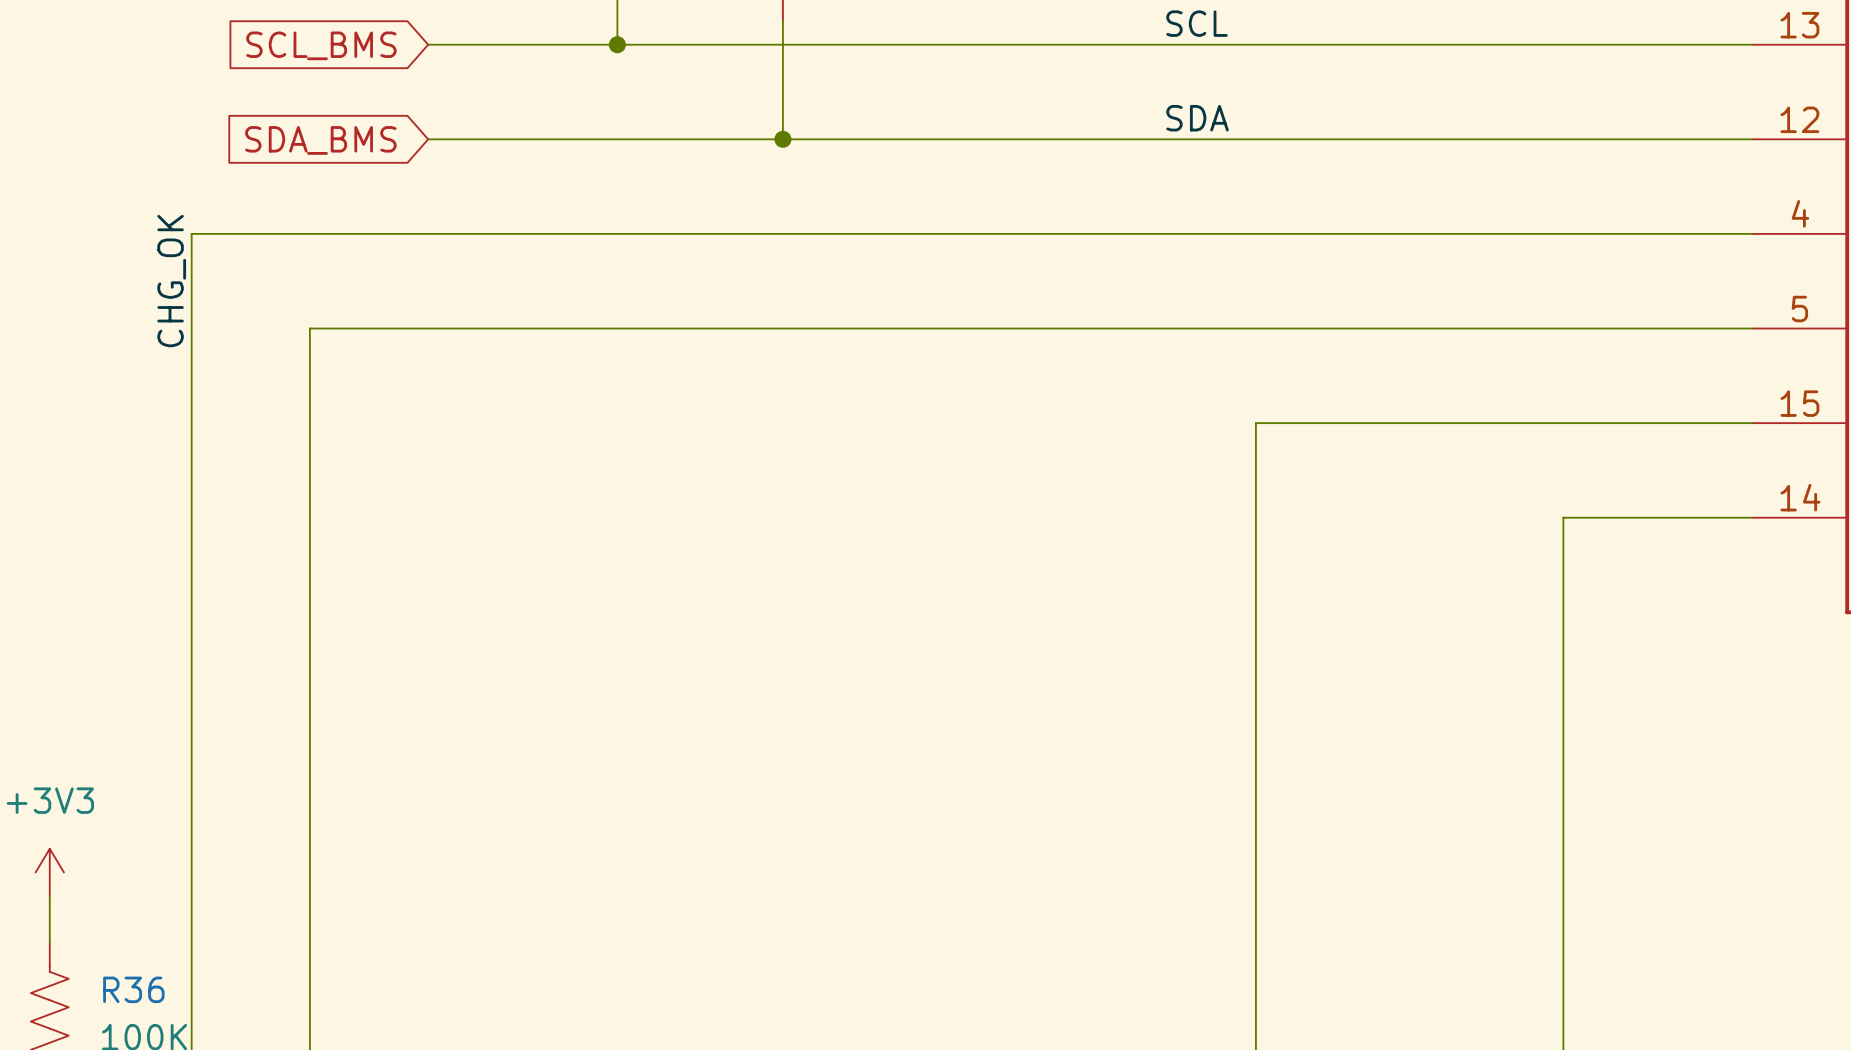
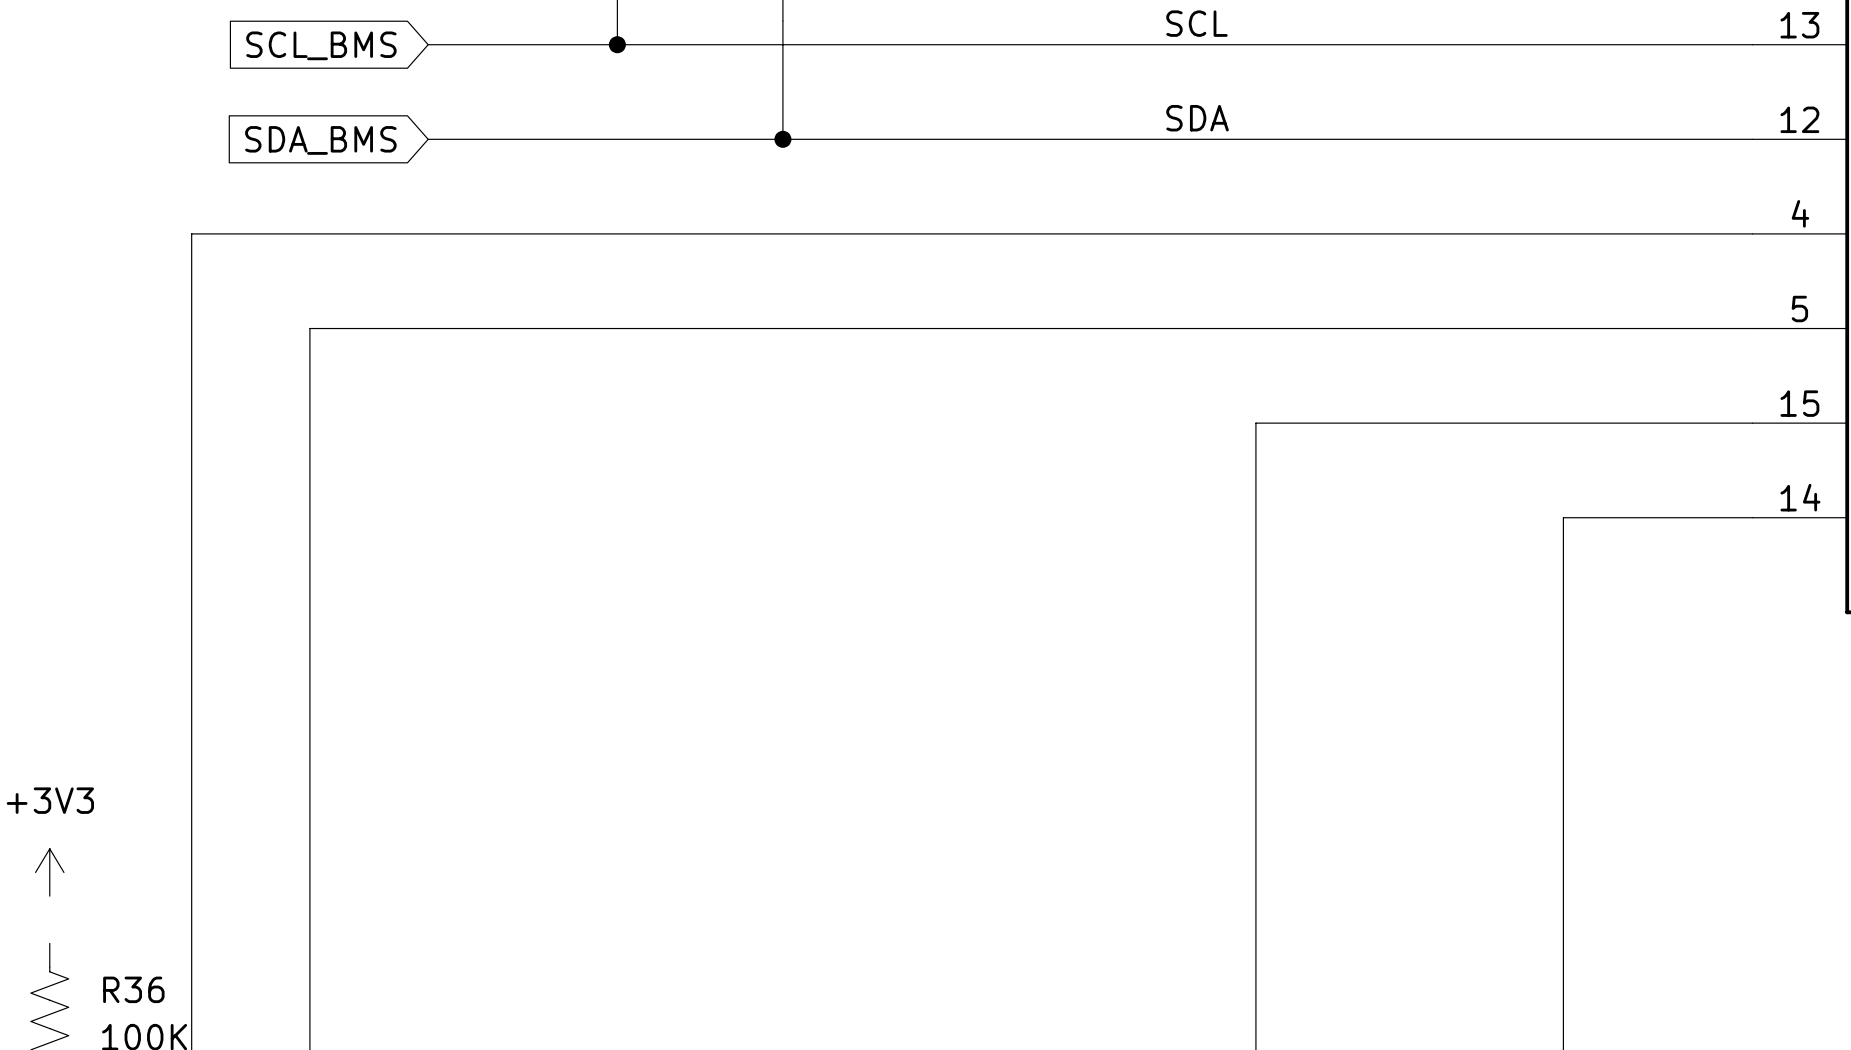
label: CHG_OK (171, 281) -> none
wire: (49, 896) (49, 943) -> none

